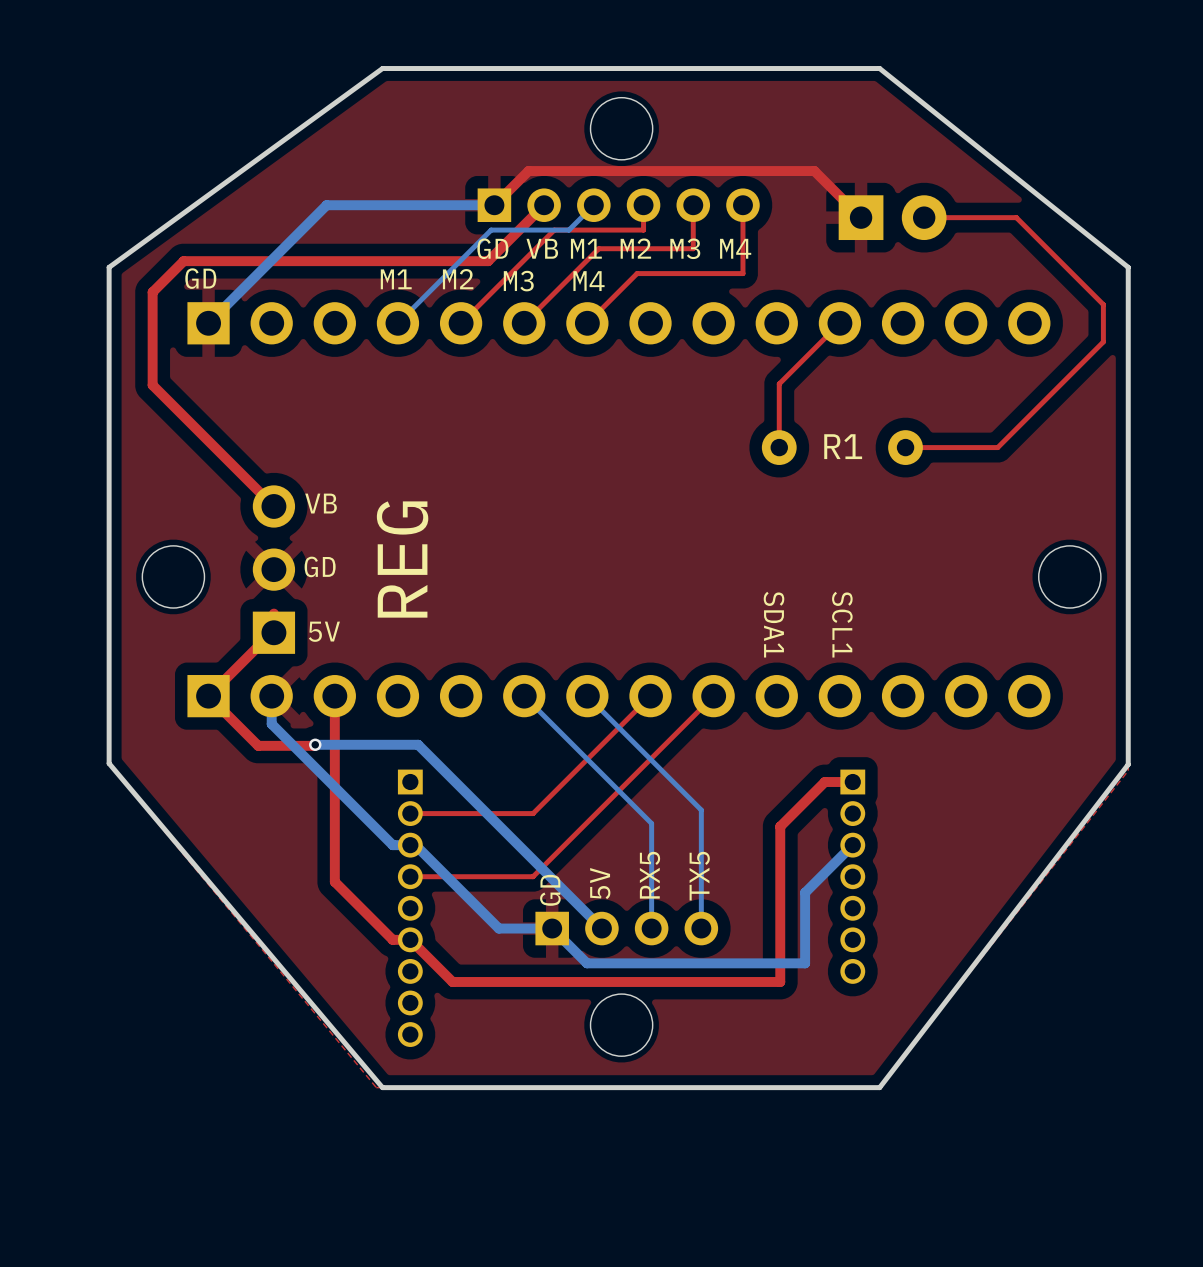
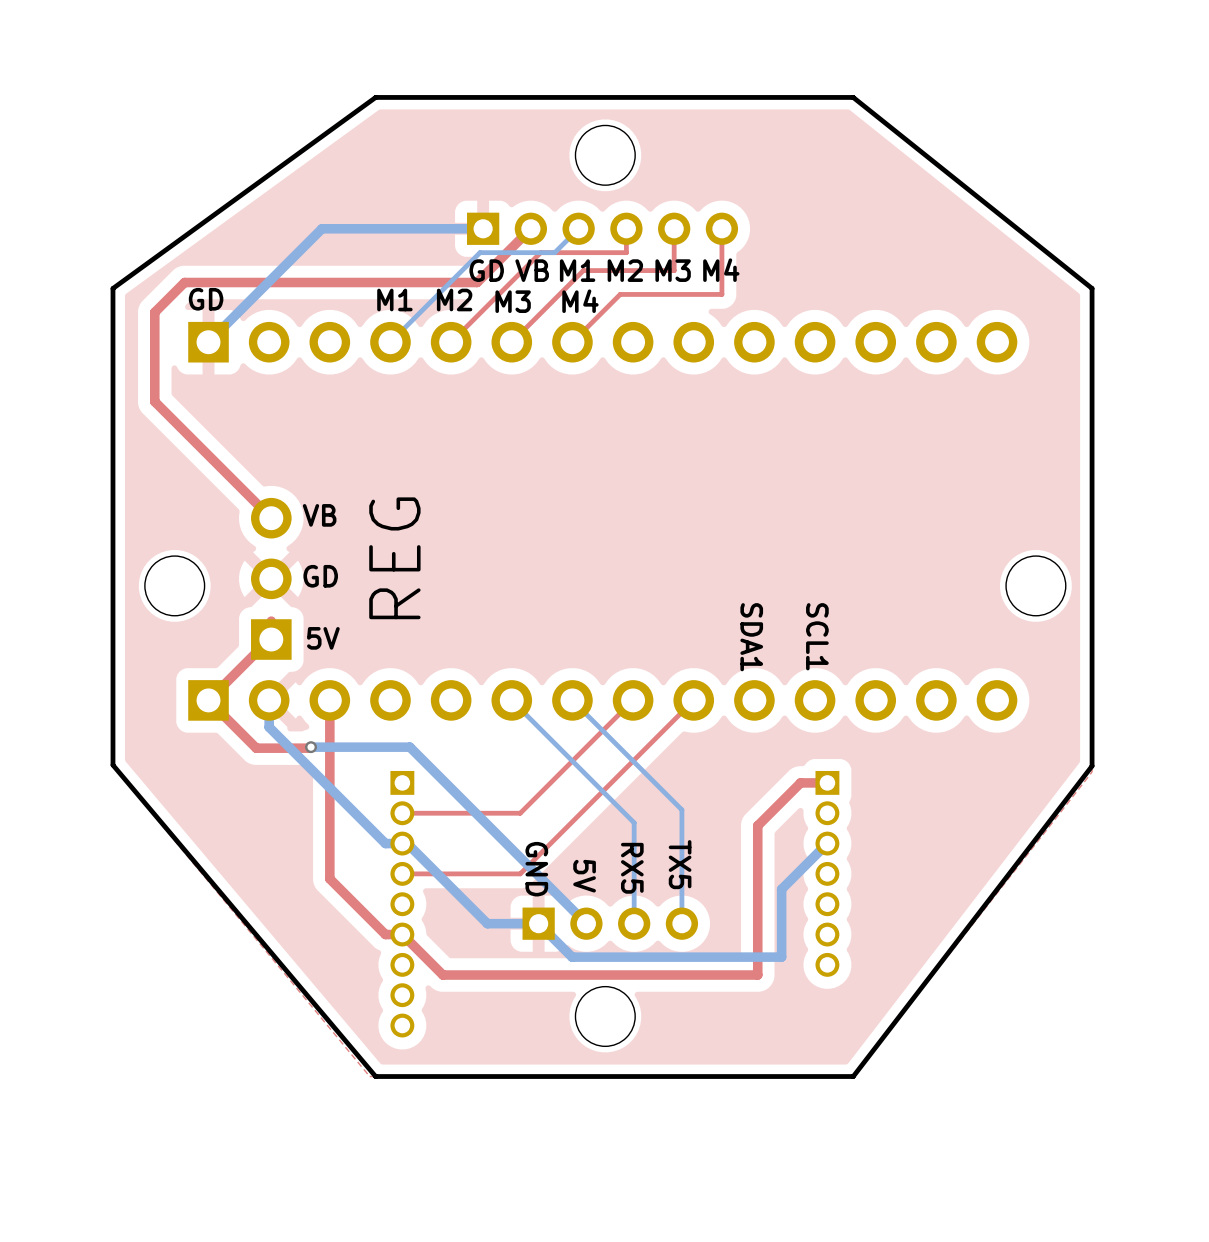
top track: (494, 205) (528, 171) (814, 171) (861, 217) -> none
part: (892, 217) -> none
top track: (924, 217) (1016, 217) (1103, 304) (1103, 341) (997, 447) (905, 447) -> none
top track: (839, 323) (779, 383) (779, 447) -> none
R1: (842, 447) -> none
text rotation: 0° (649, 875) -> 180° (632, 868)
text rotation: 0° (699, 876) -> 180° (680, 864)
text rotation: 0° (600, 883) -> 180° (584, 876)
text: GD (550, 890) -> GND (536, 869)

